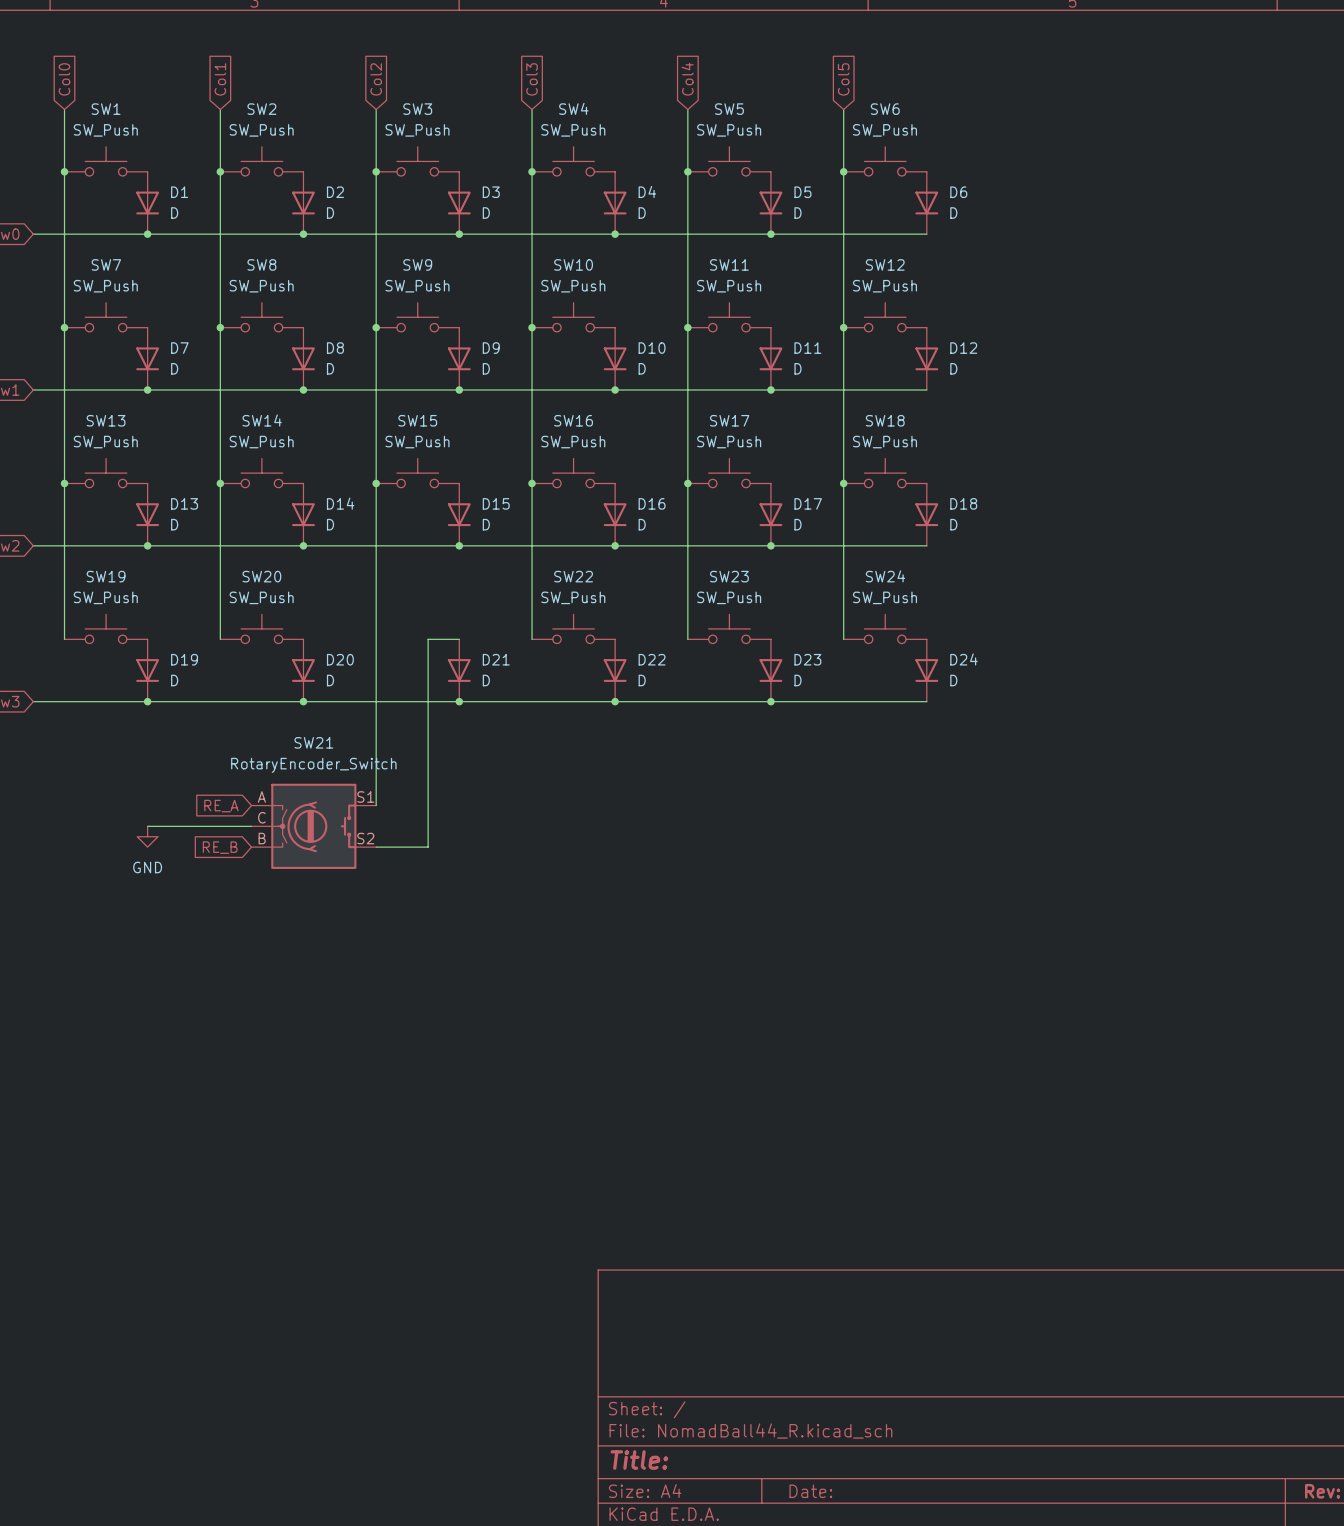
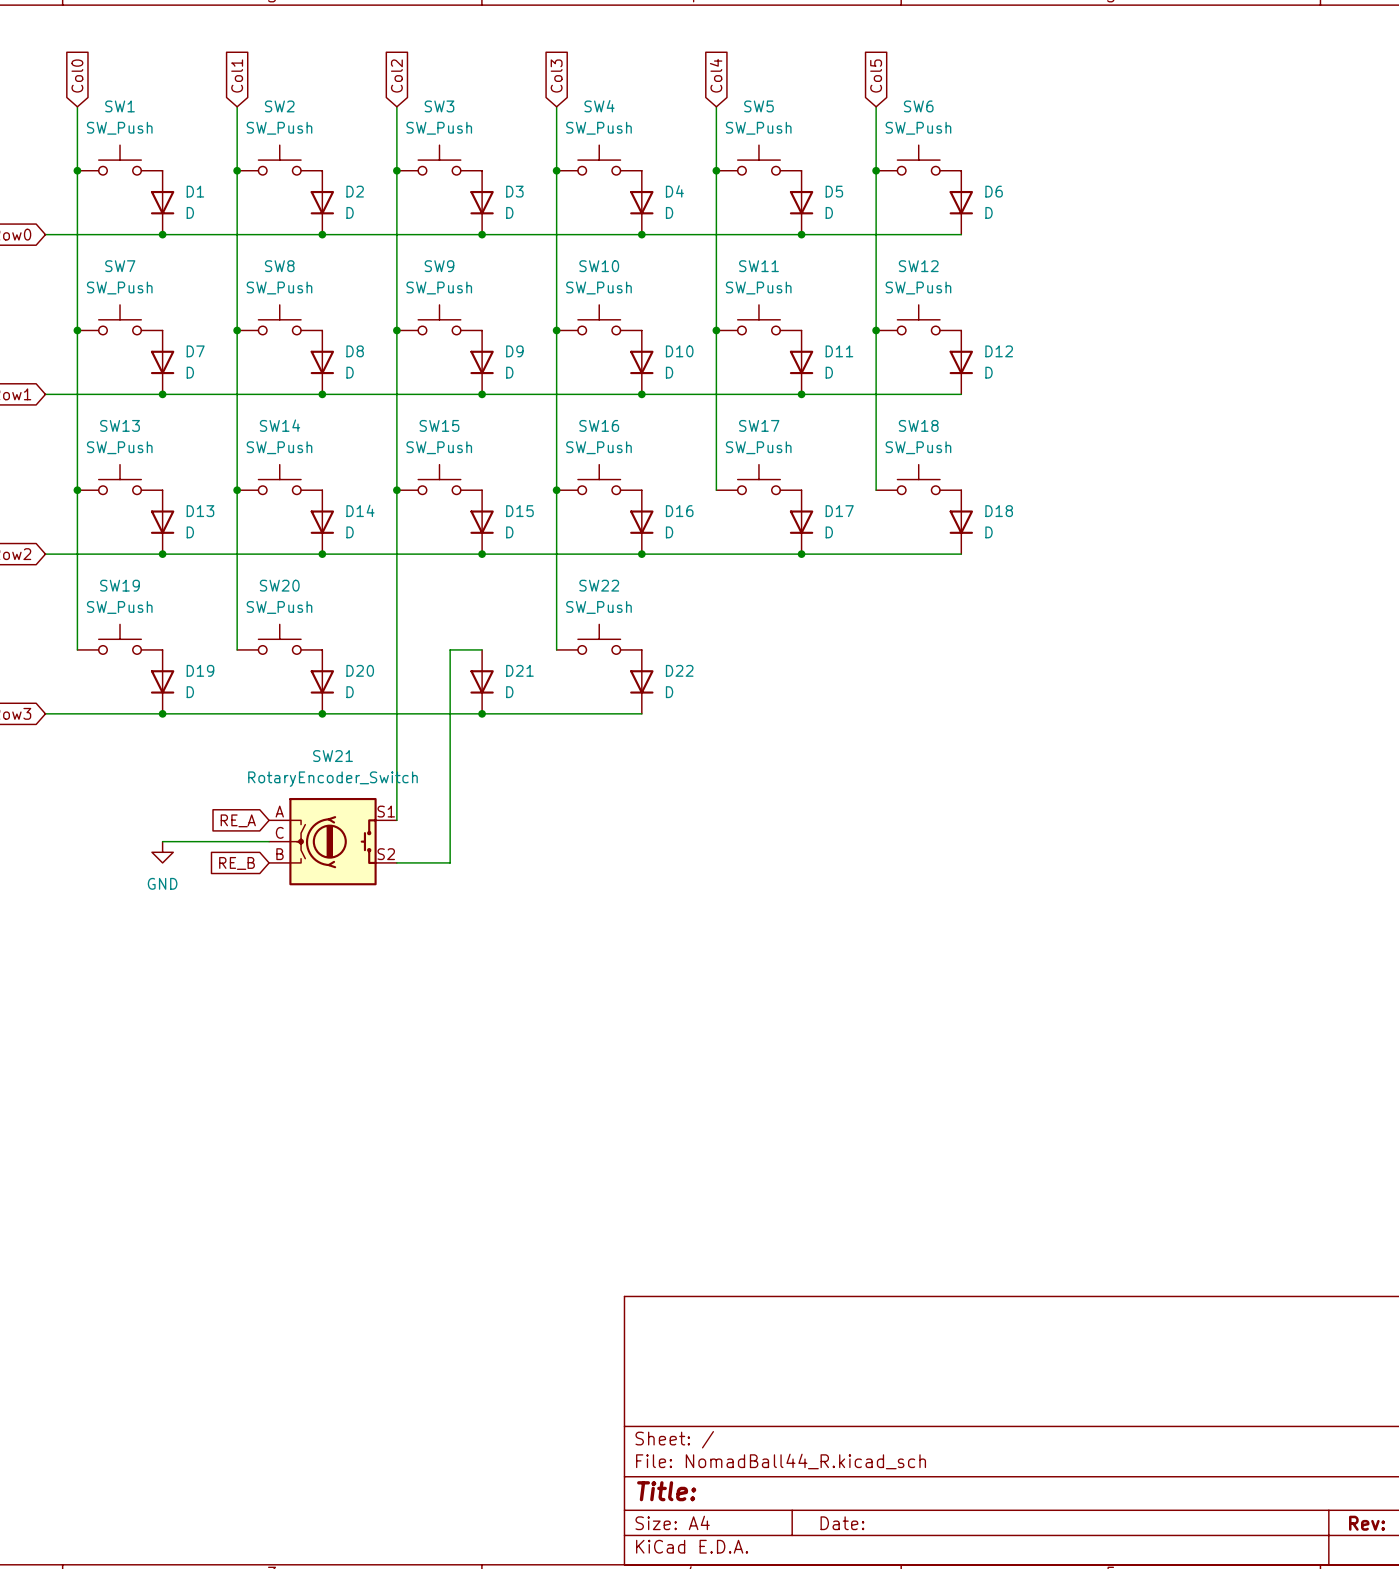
wire: (687, 483) (687, 639) -> none
junction: (687, 483) -> none
wire: (843, 483) (843, 639) -> none
junction: (843, 483) -> none
SW23: SW_Push (729, 628) -> none
SW24: SW_Push (885, 628) -> none
D23: D (770, 670) -> none
D24: D (926, 670) -> none
wire: (615, 701) (926, 701) -> none
junction: (615, 701) -> none
junction: (770, 701) -> none

